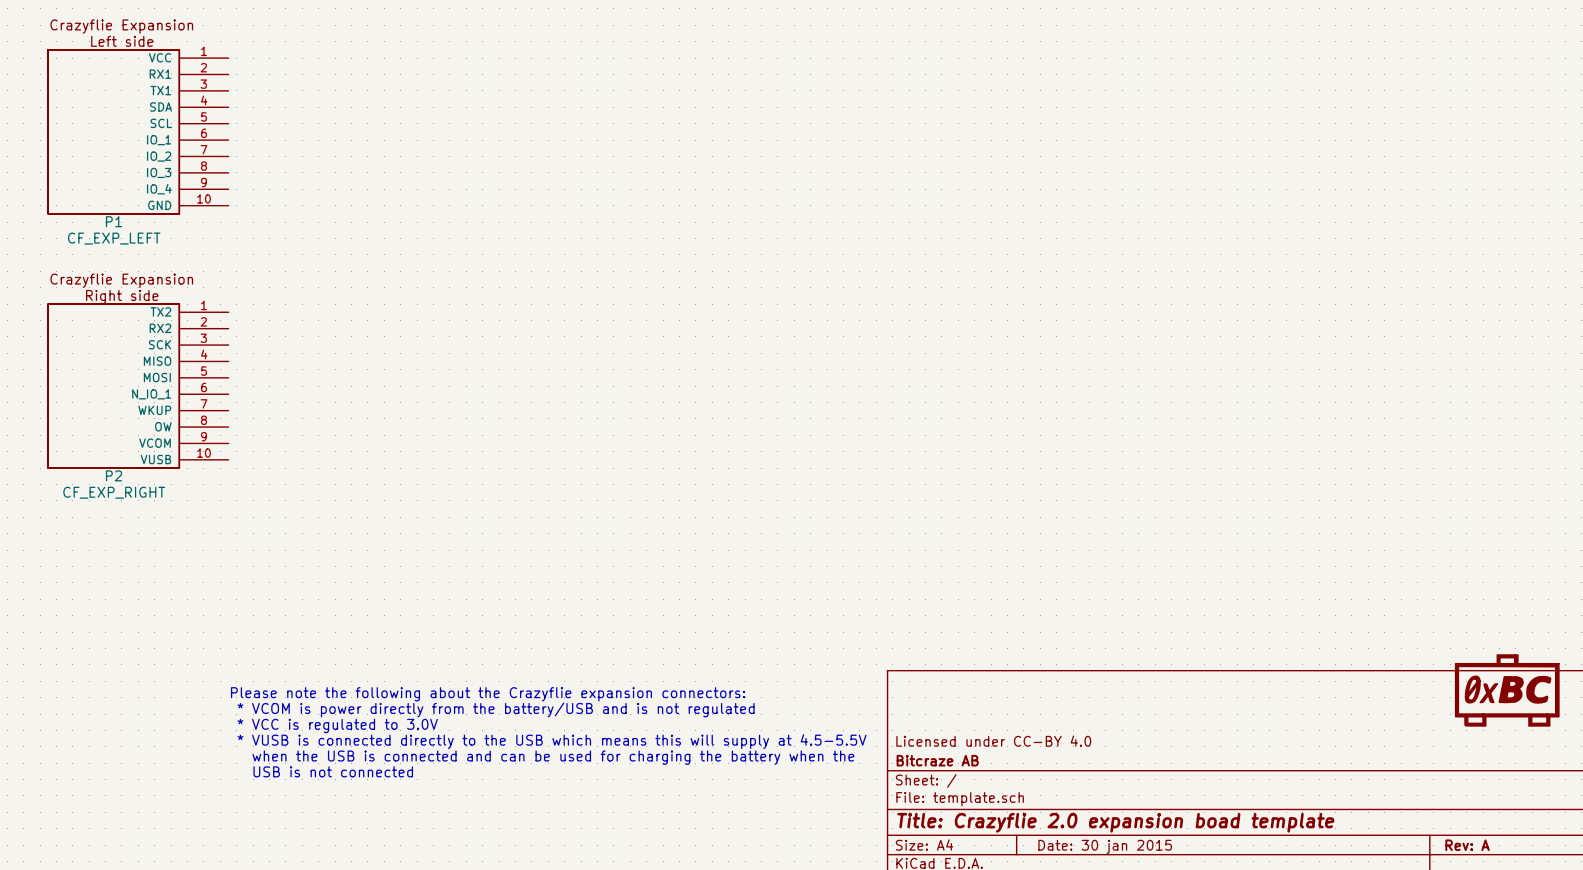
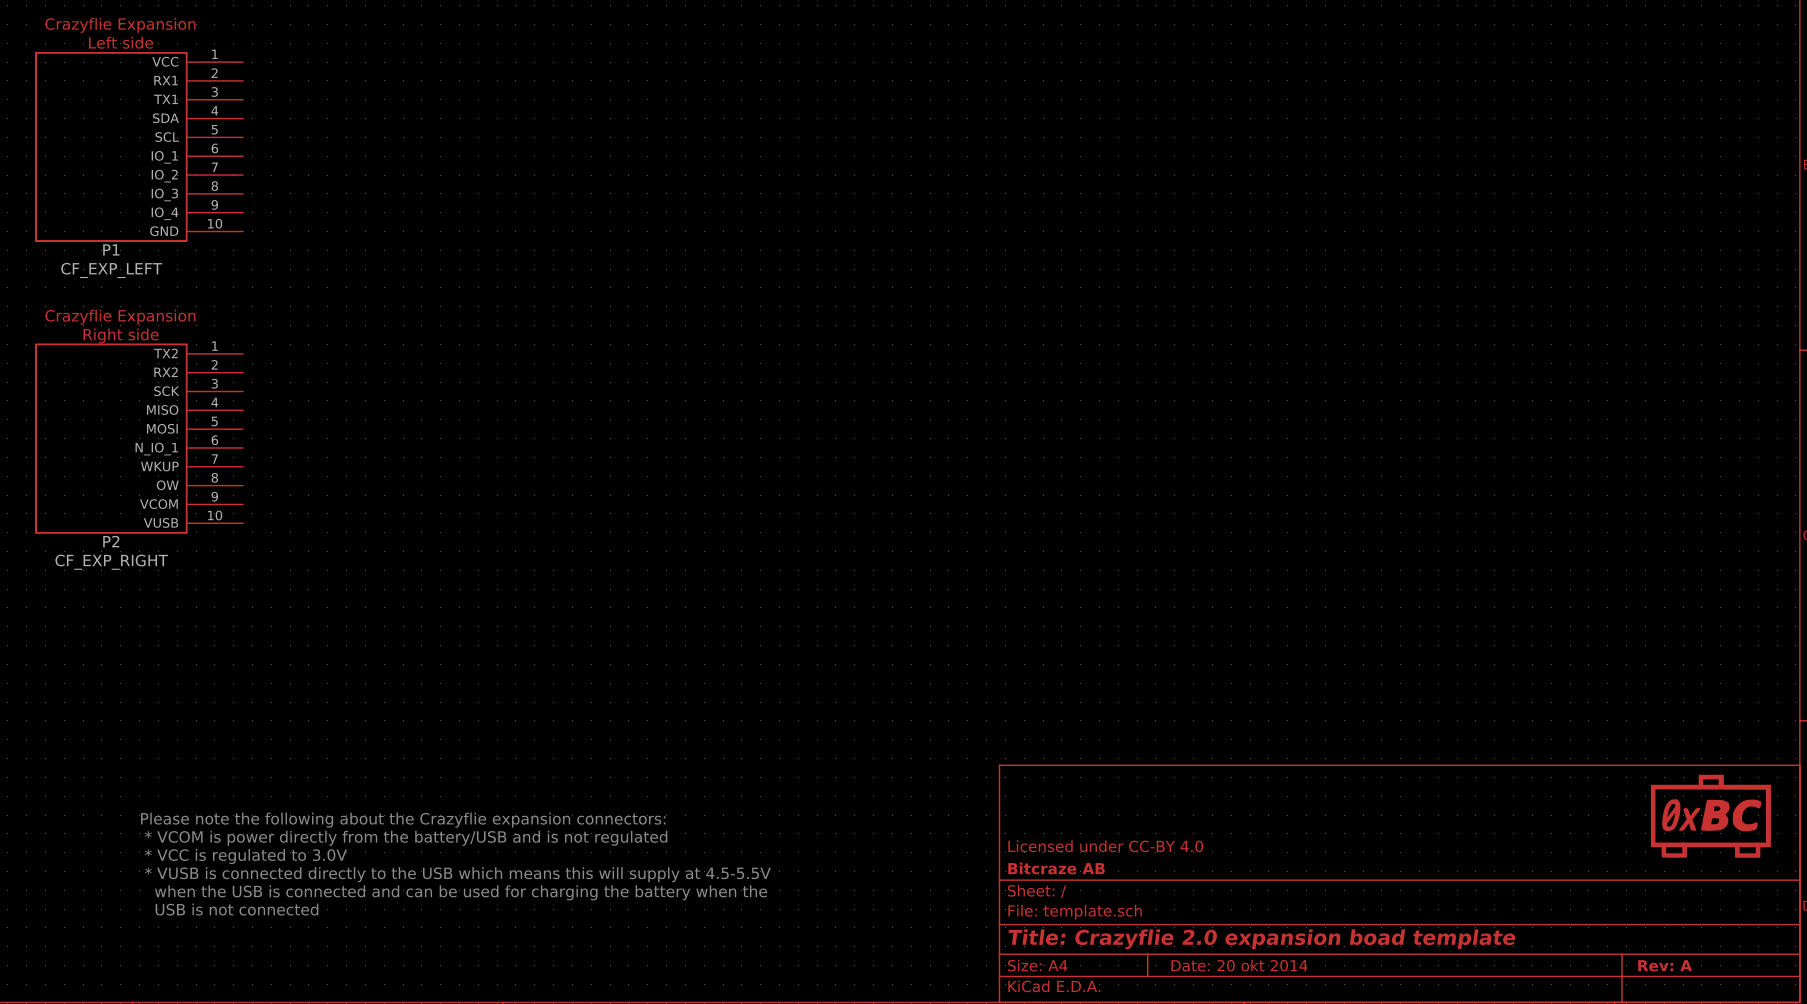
part position: (1507, 690) -> (1710, 816)
text position: Please note the following about the Crazyflie expansion connectors: (488, 694) -> Please note the following about the Crazyflie expansion connectors: (403, 820)
text position: * VCOM is power directly from the battery/USB and is not regulated (496, 709) -> * VCOM is power directly from the battery/USB and is not regulated (406, 838)
text position: * VCC is regulated to 3.0V (337, 725) -> * VCC is regulated to 3.0V (245, 856)
text position: * VUSB is connected directly to the USB which means this will supply at 4.5-5.5V (552, 741) -> * VUSB is connected directly to the USB which means this will supply at 4.5-5.5V (457, 874)
text position: when the USB is connected and can be used for charging the battery when the (553, 757) -> when the USB is connected and can be used for charging the battery when the (461, 892)
text position: USB is not connected (333, 771) -> USB is not connected (236, 909)
title block: Date: 30 jan 2015 (1105, 846) -> Date: 20 okt 2014 (1239, 965)

